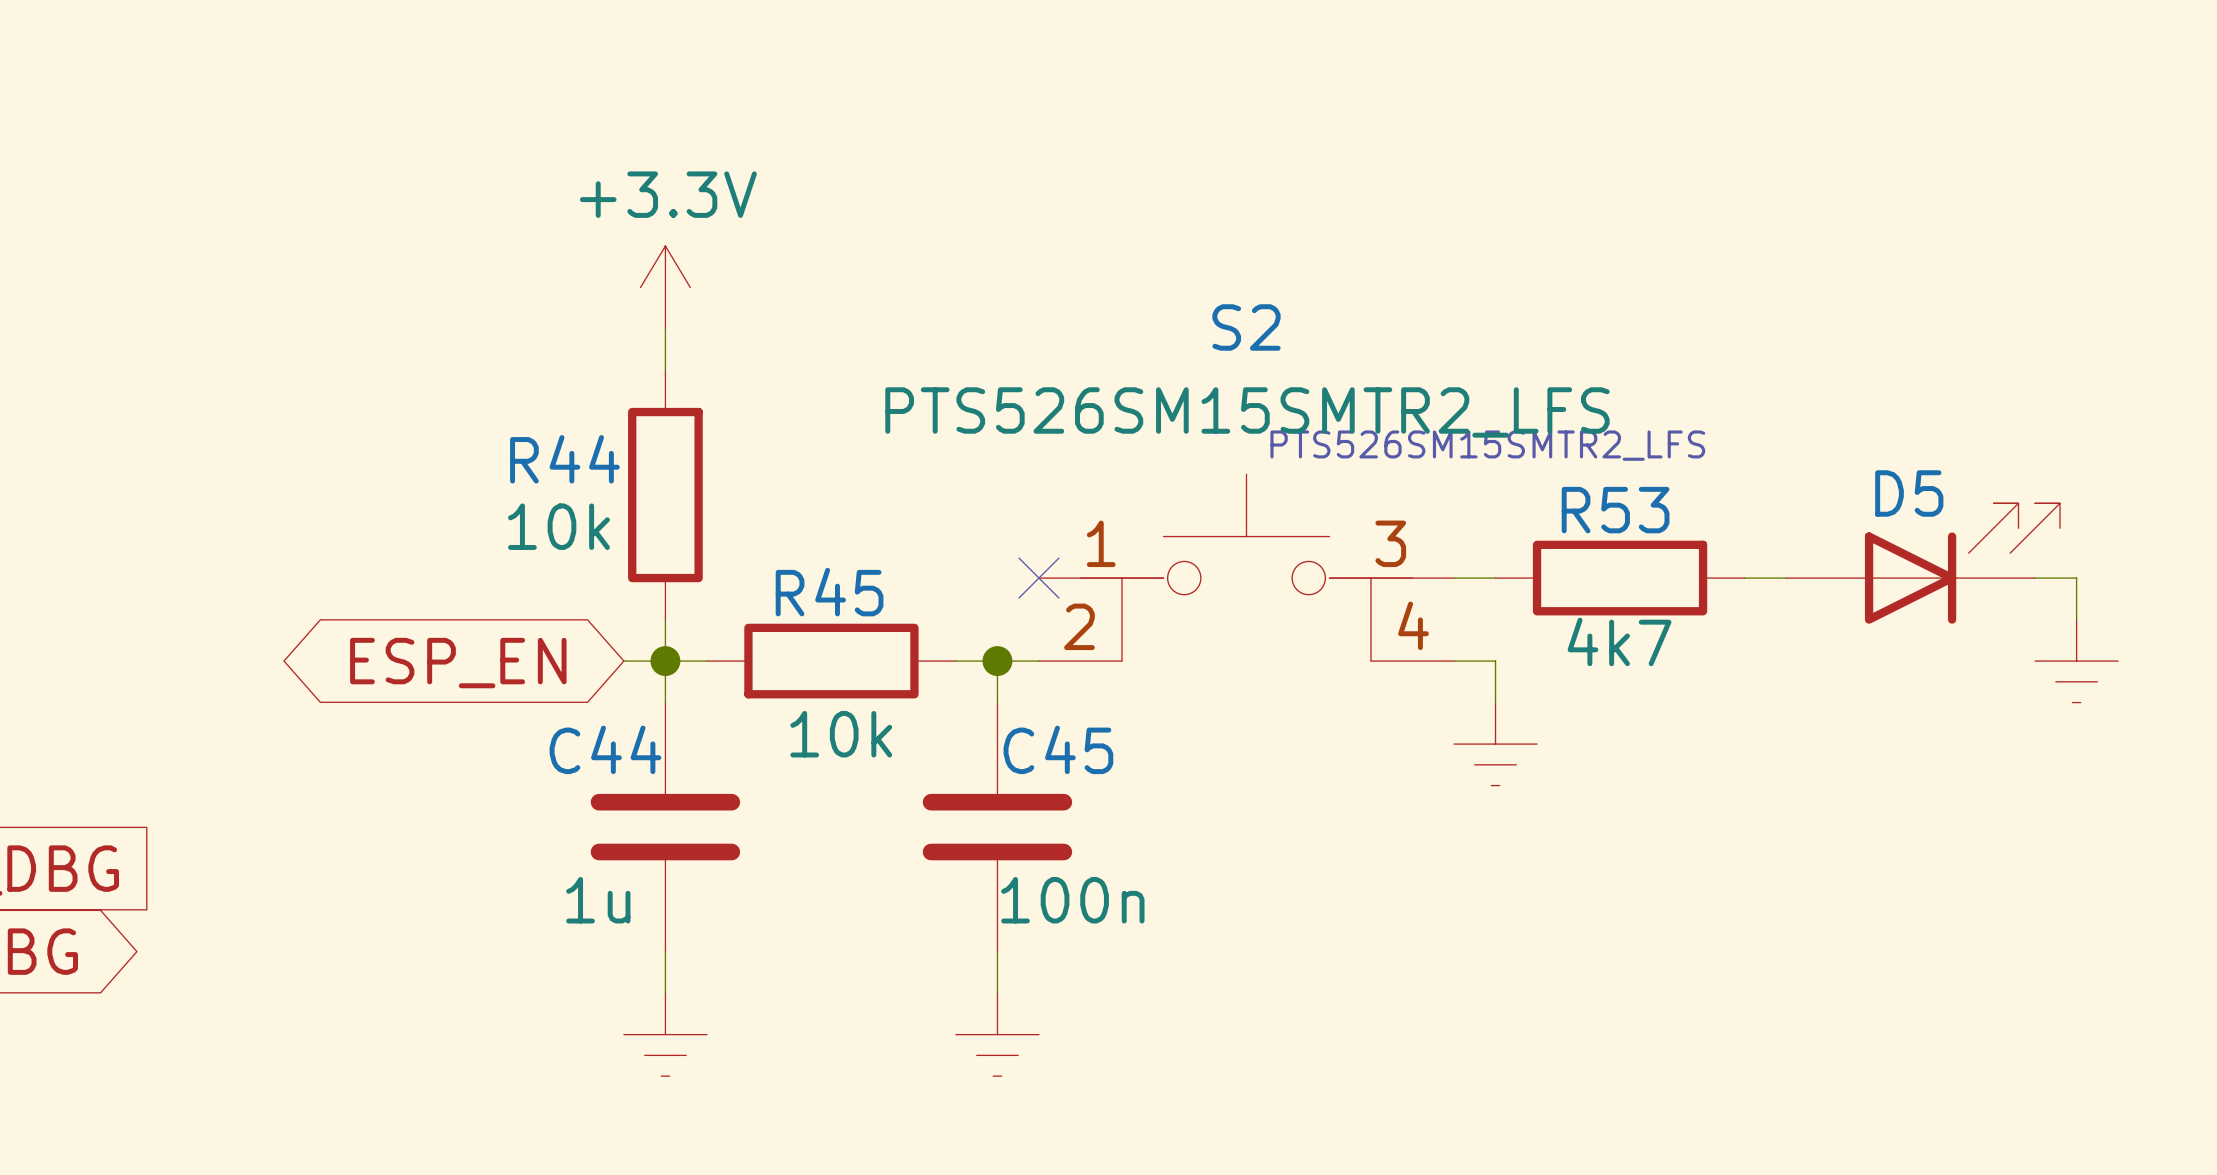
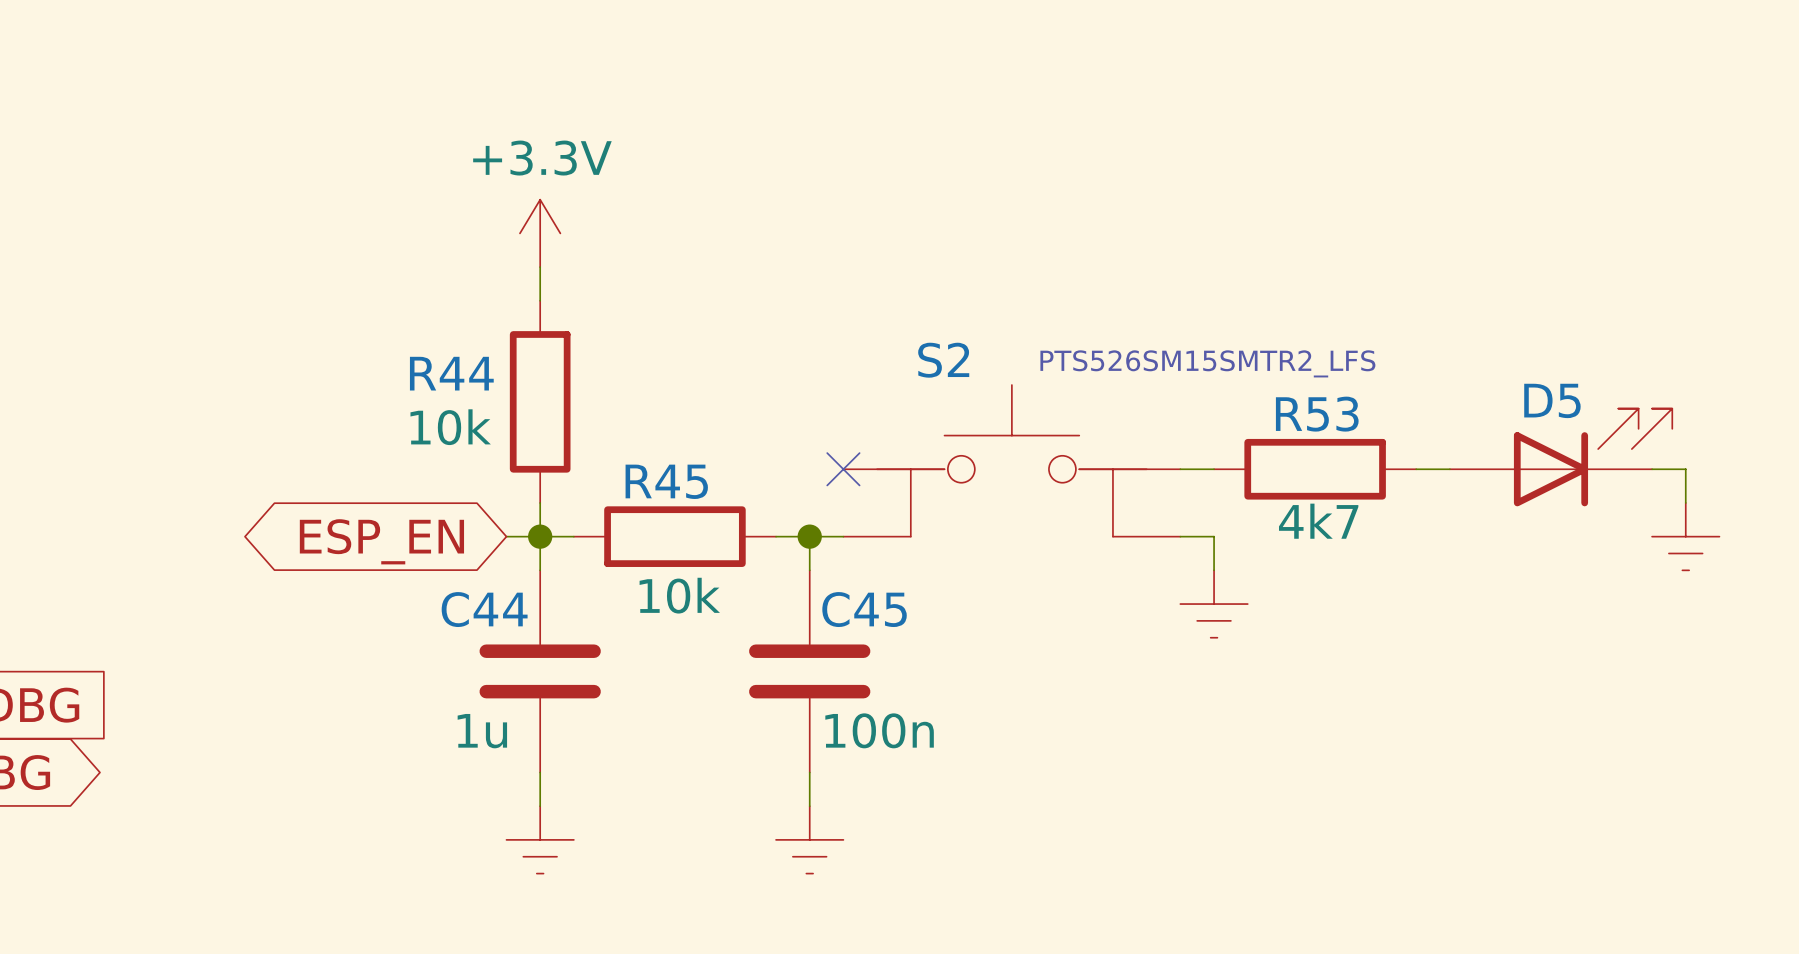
S2 name position: S2 (1246, 327) -> S2 (943, 360)
S2 value: PTS526SM15SMTR2_LFS (1247, 412) -> none
S2 pin number: 1 (1101, 543) -> none
S2 pin number: 3 (1390, 543) -> none
S2 pin number: 4 (1413, 625) -> none
S2 pin number: 2 (1079, 626) -> none

